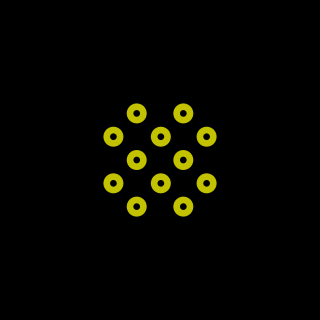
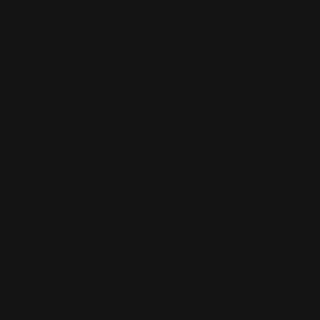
part: (160, 160) -> none

